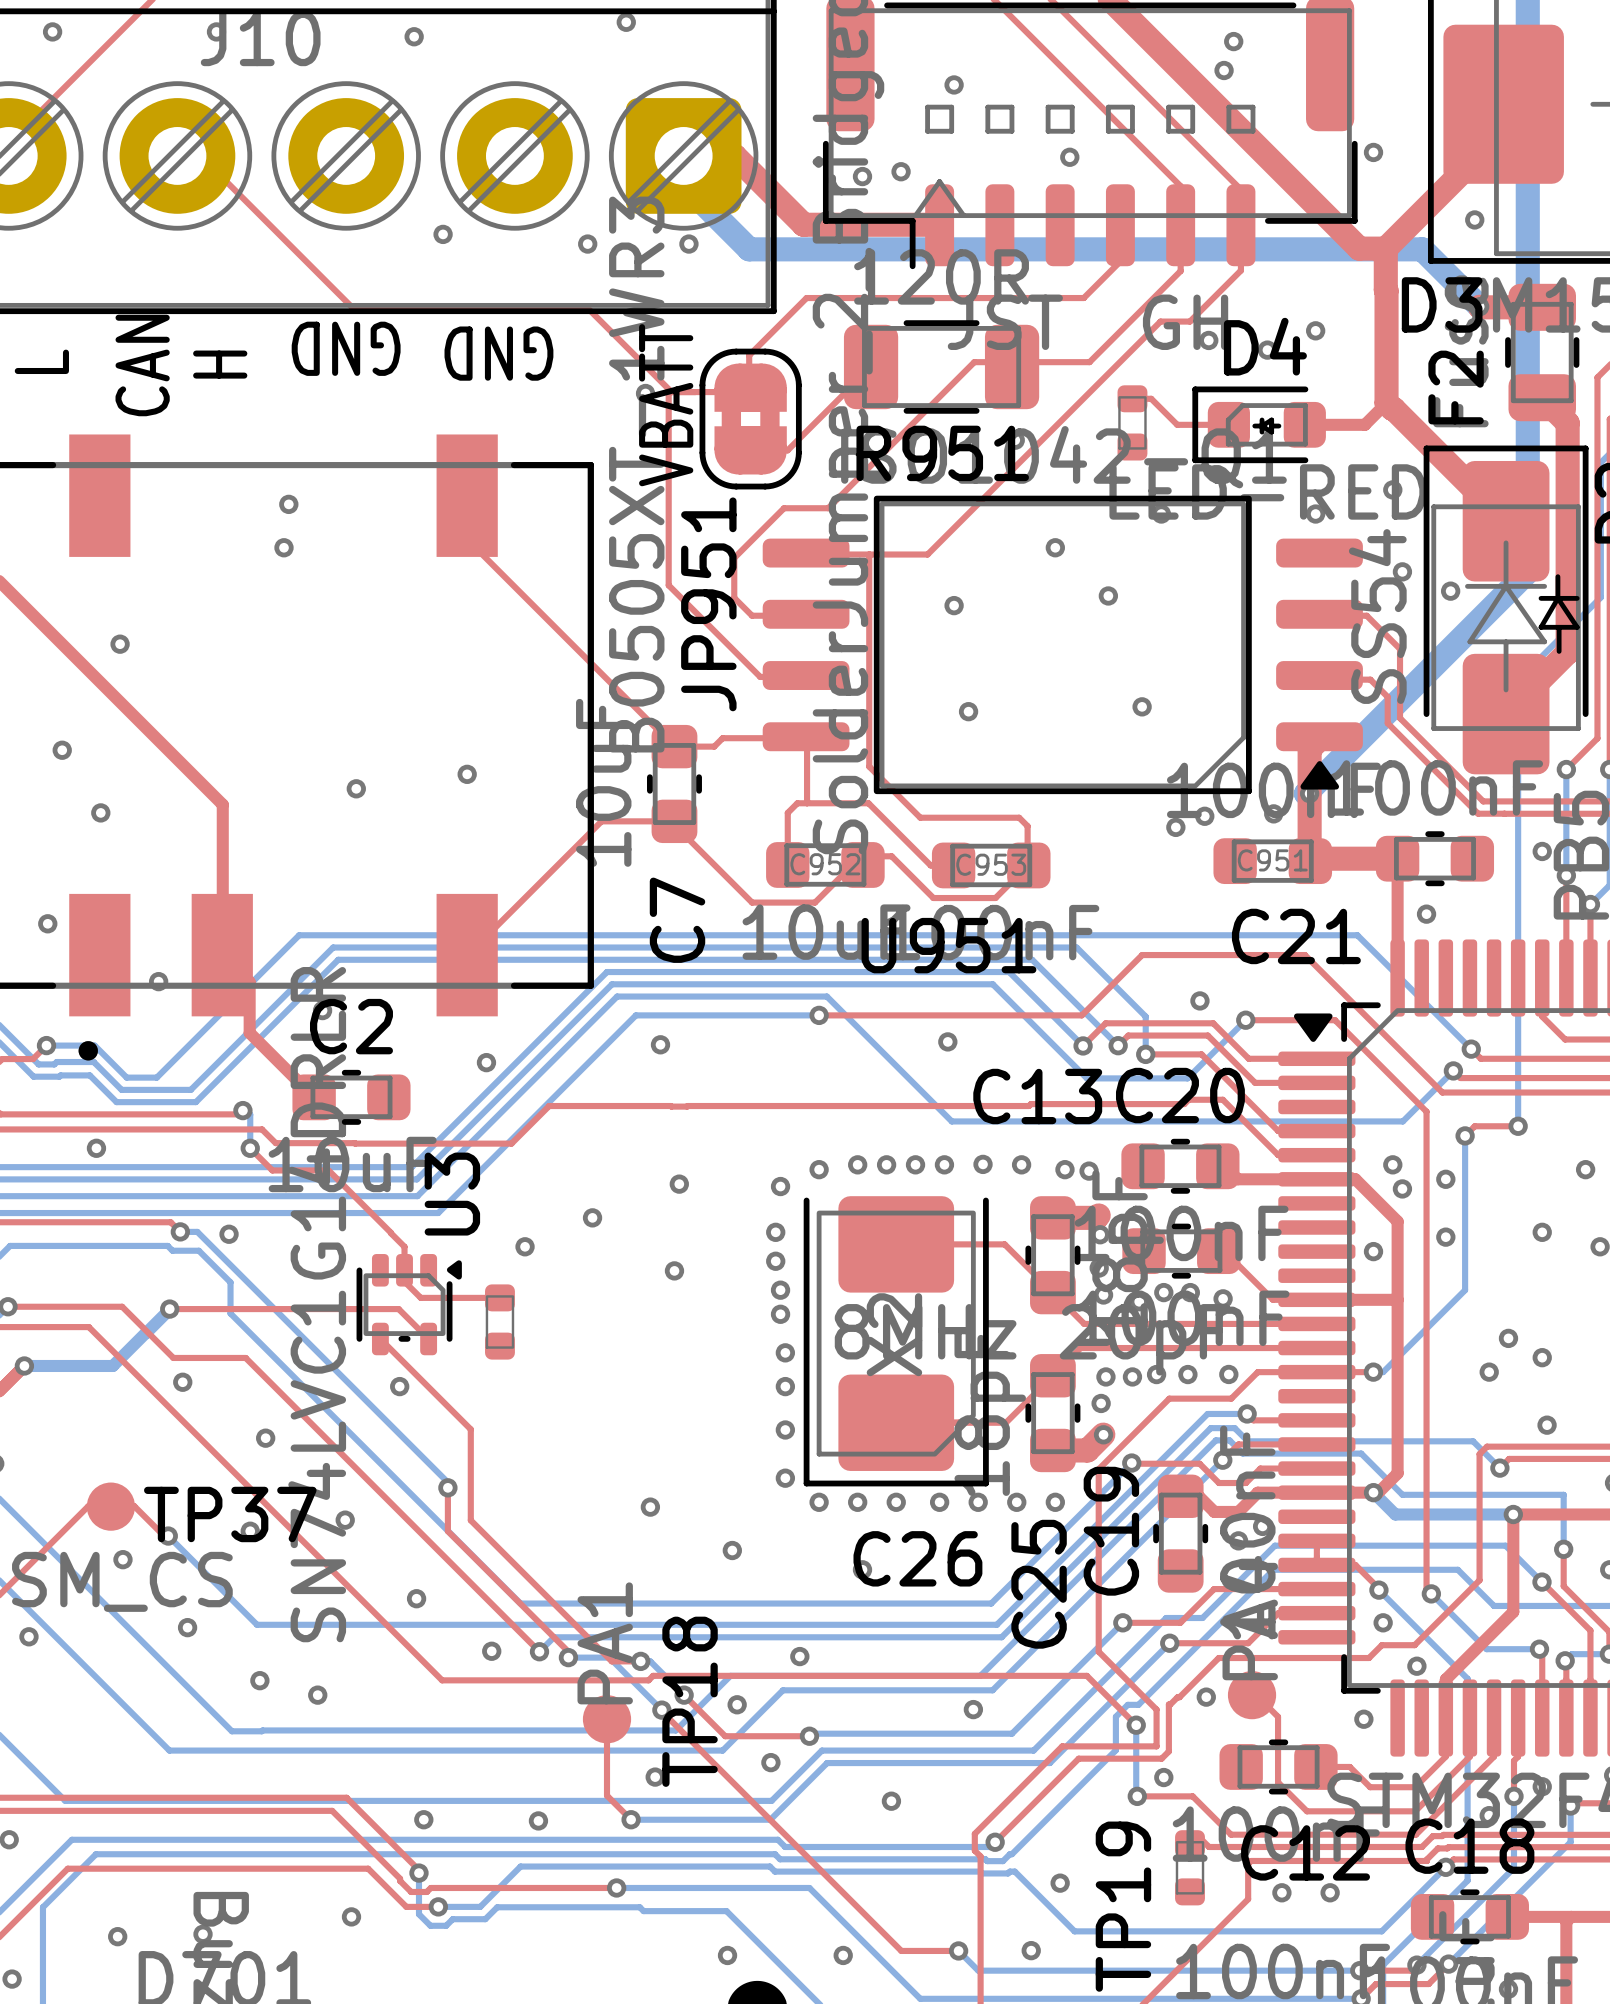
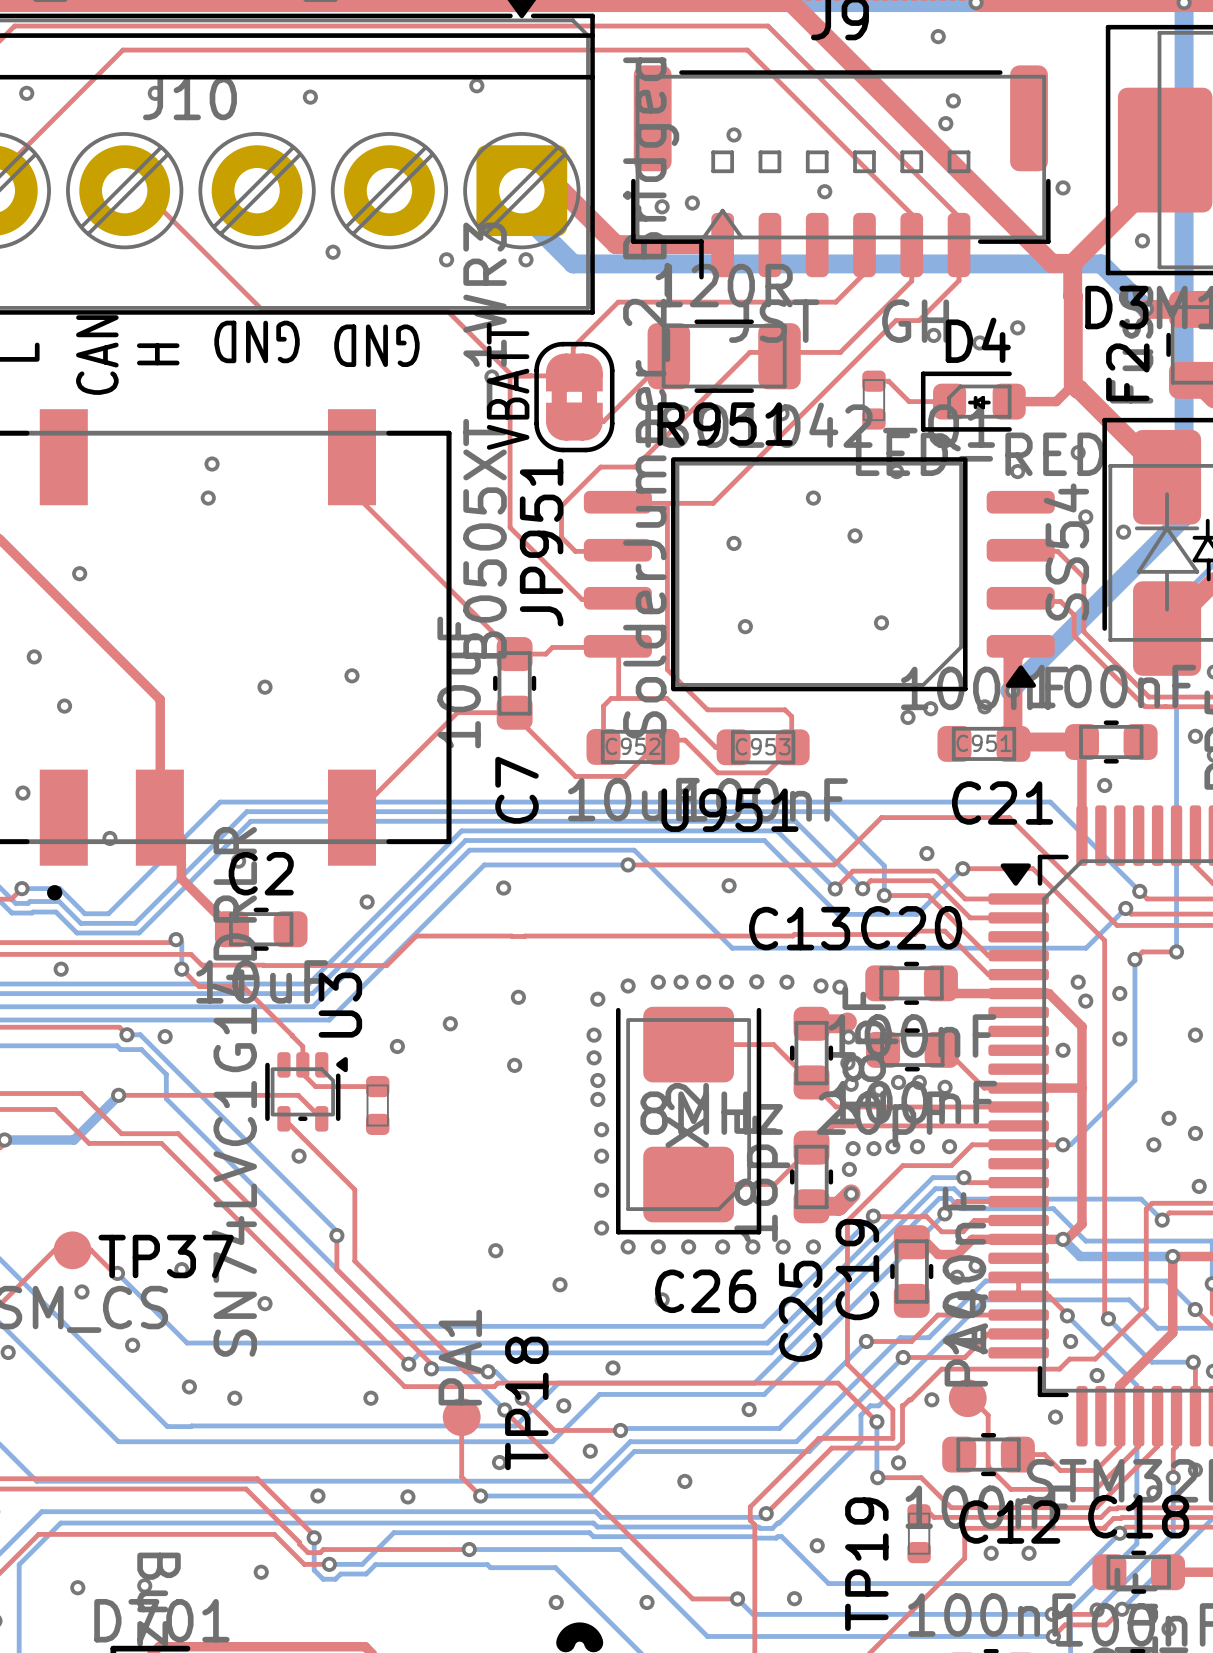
top track: (132, 1370) (442, 1680) (534, 1680) -> (89, 1143) (161, 1143) (404, 1386)
via: (182, 1382) -> none
via: (265, 1438) -> none
via: (345, 1520) -> none
via: none -> (265, 1303)
via: (416, 1598) -> none
via position: (491, 1651) -> (370, 1398)

